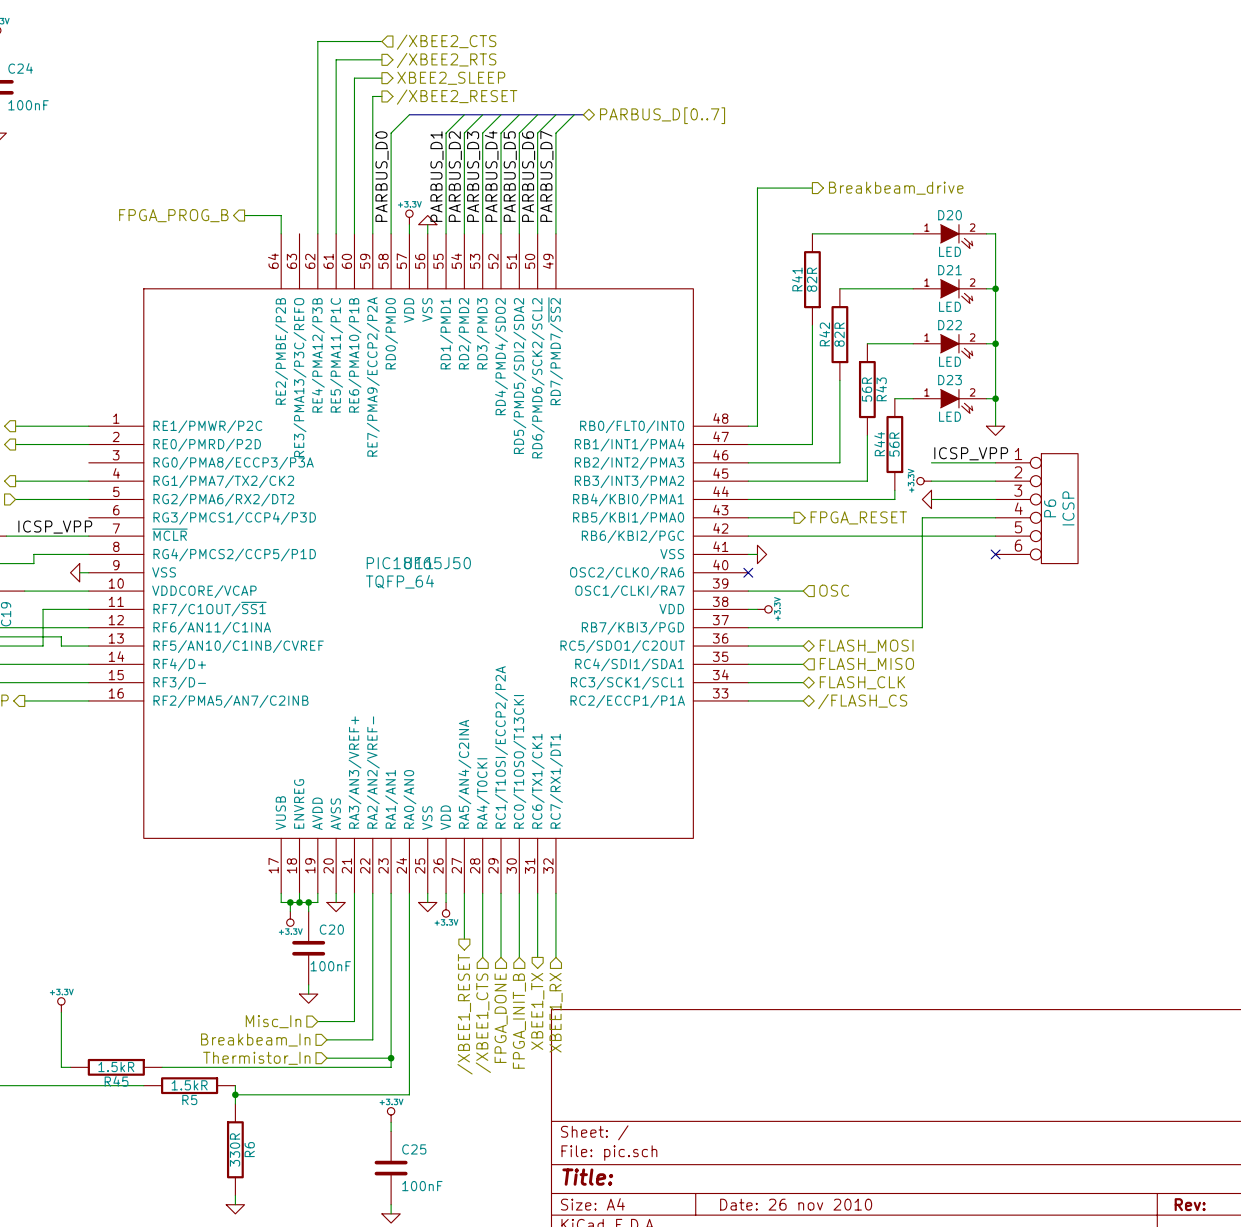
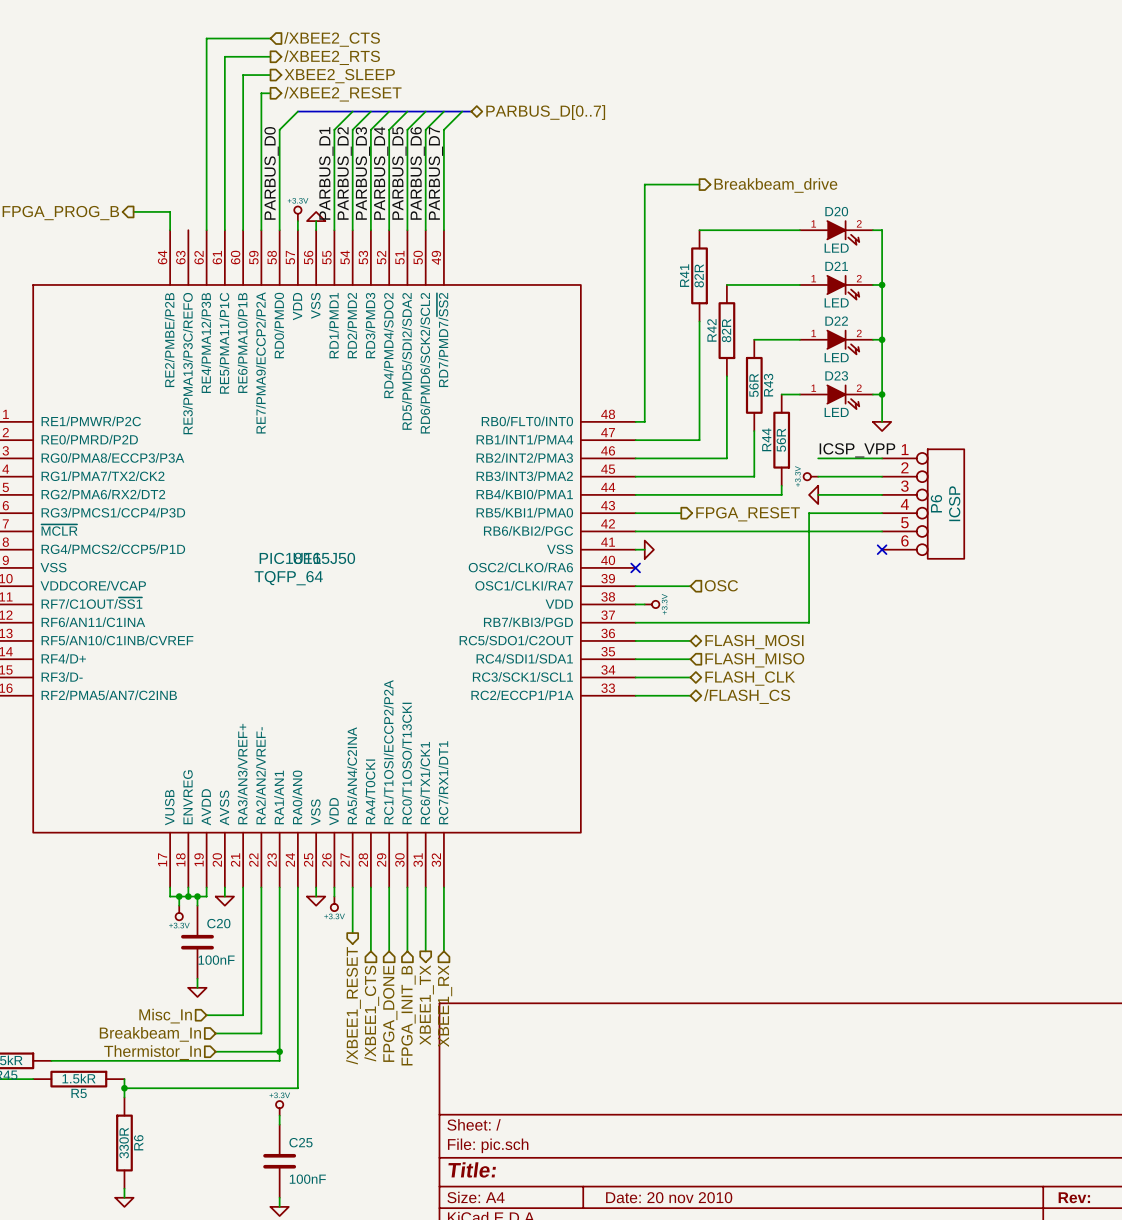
title block: Date: 26 nov 2010 (796, 1204) -> Date: 20 nov 2010 (669, 1197)

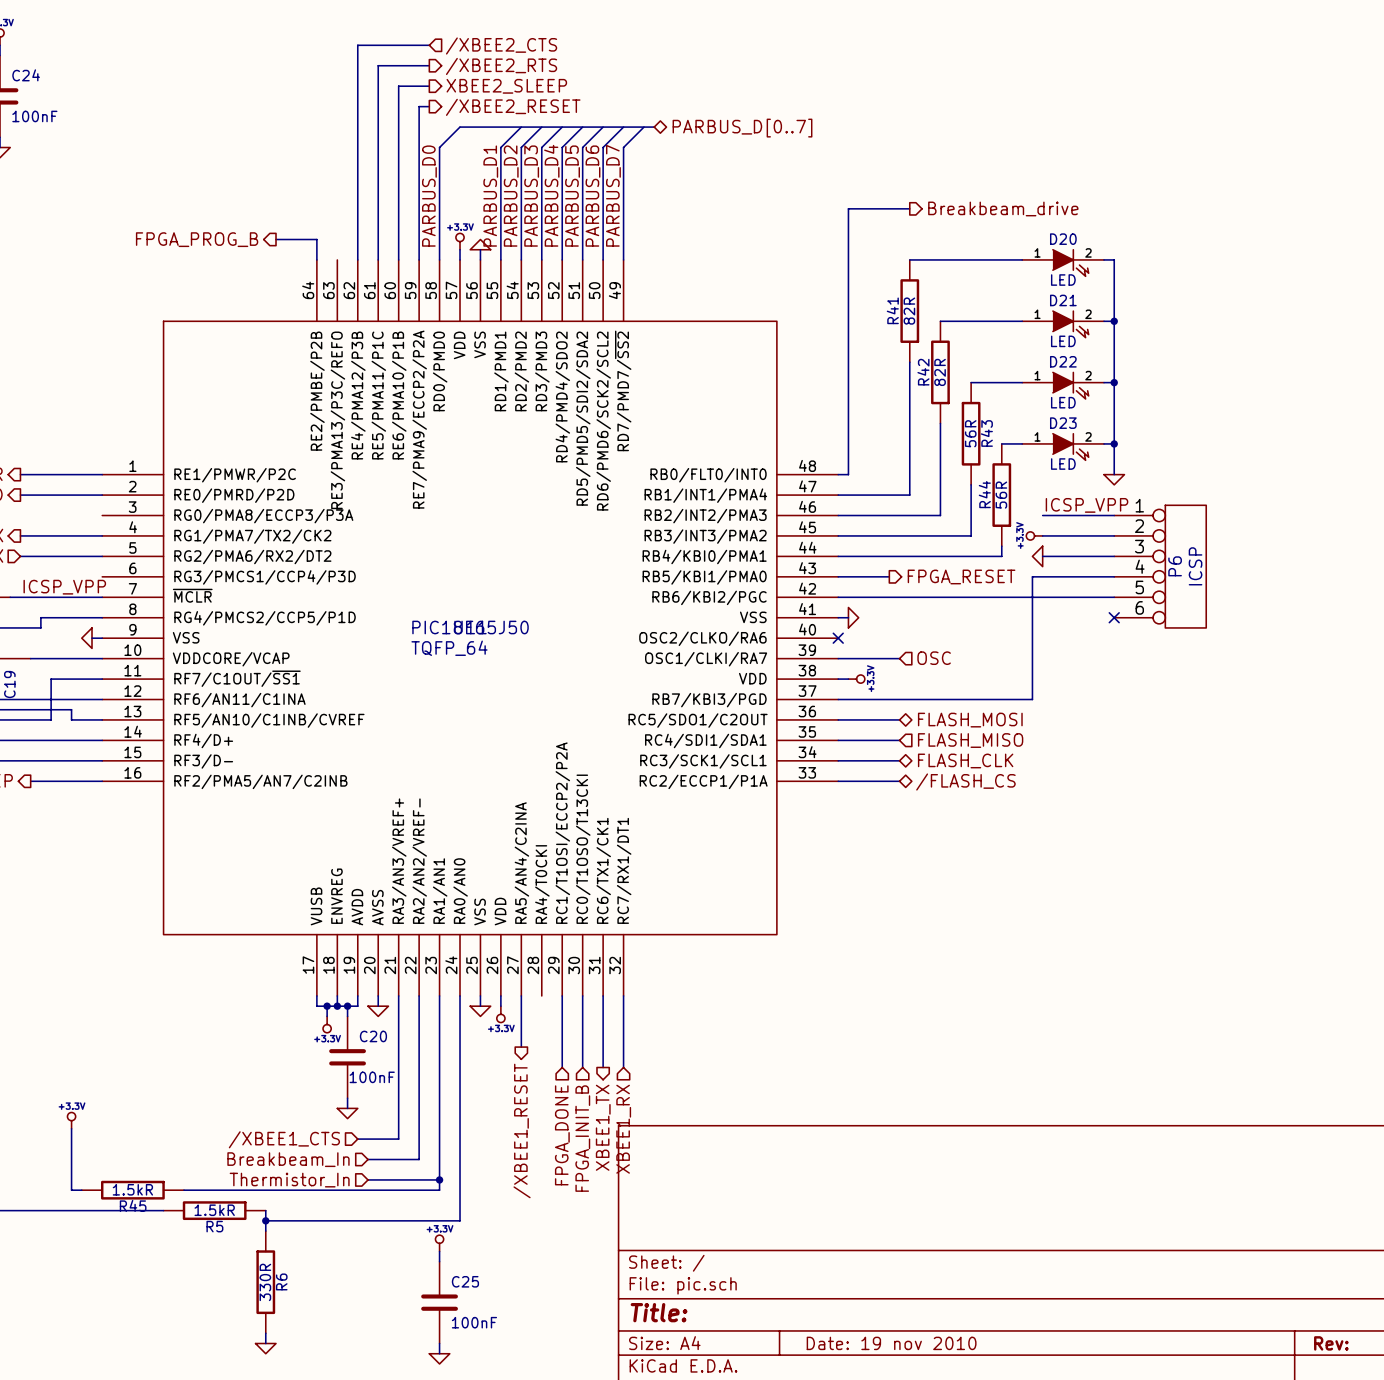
wire: (370, 887) (370, 951) -> none
hierarchical label: /XBEE1_CTS (371, 1013) -> none
hierarchical label: Misc_In (165, 1016) -> /XBEE1_CTS (284, 1139)
title block: Date: 20 nov 2010 (669, 1197) -> Date: 19 nov 2010 (891, 1343)

